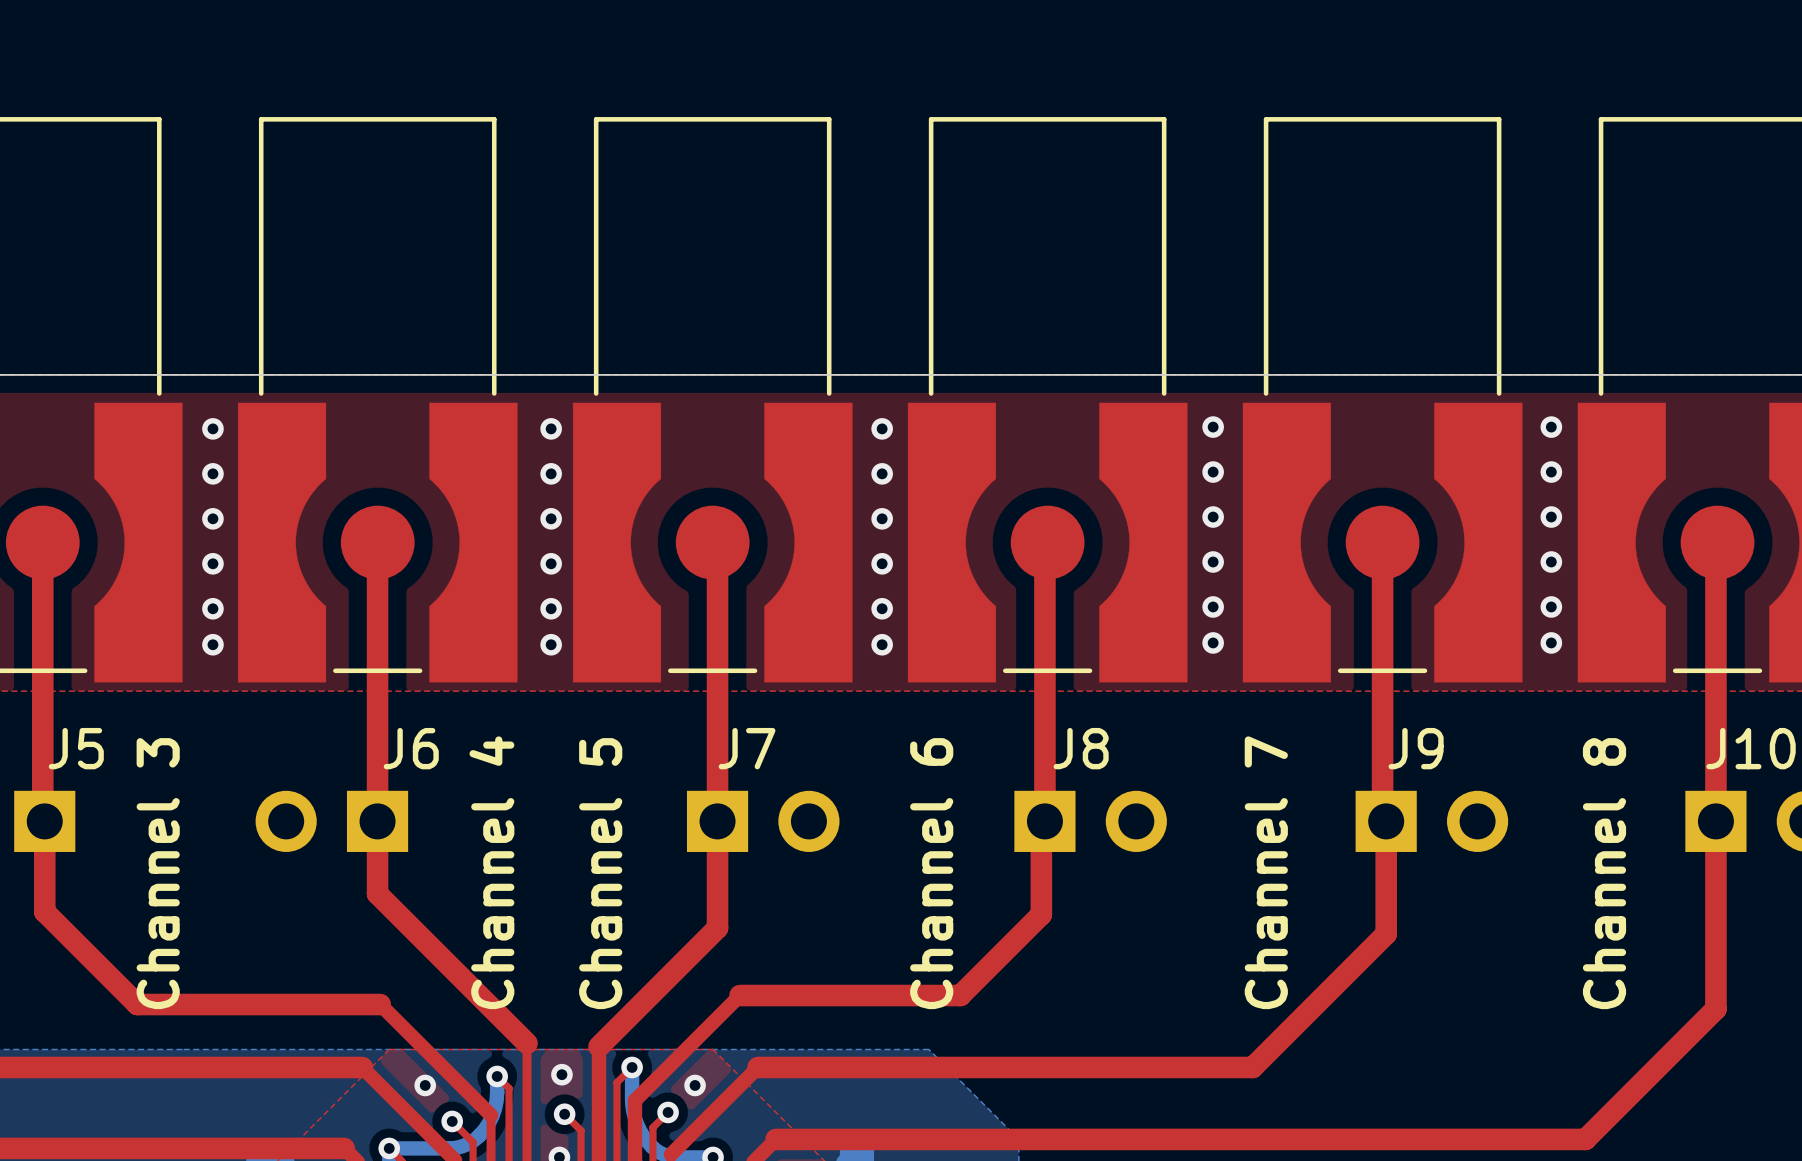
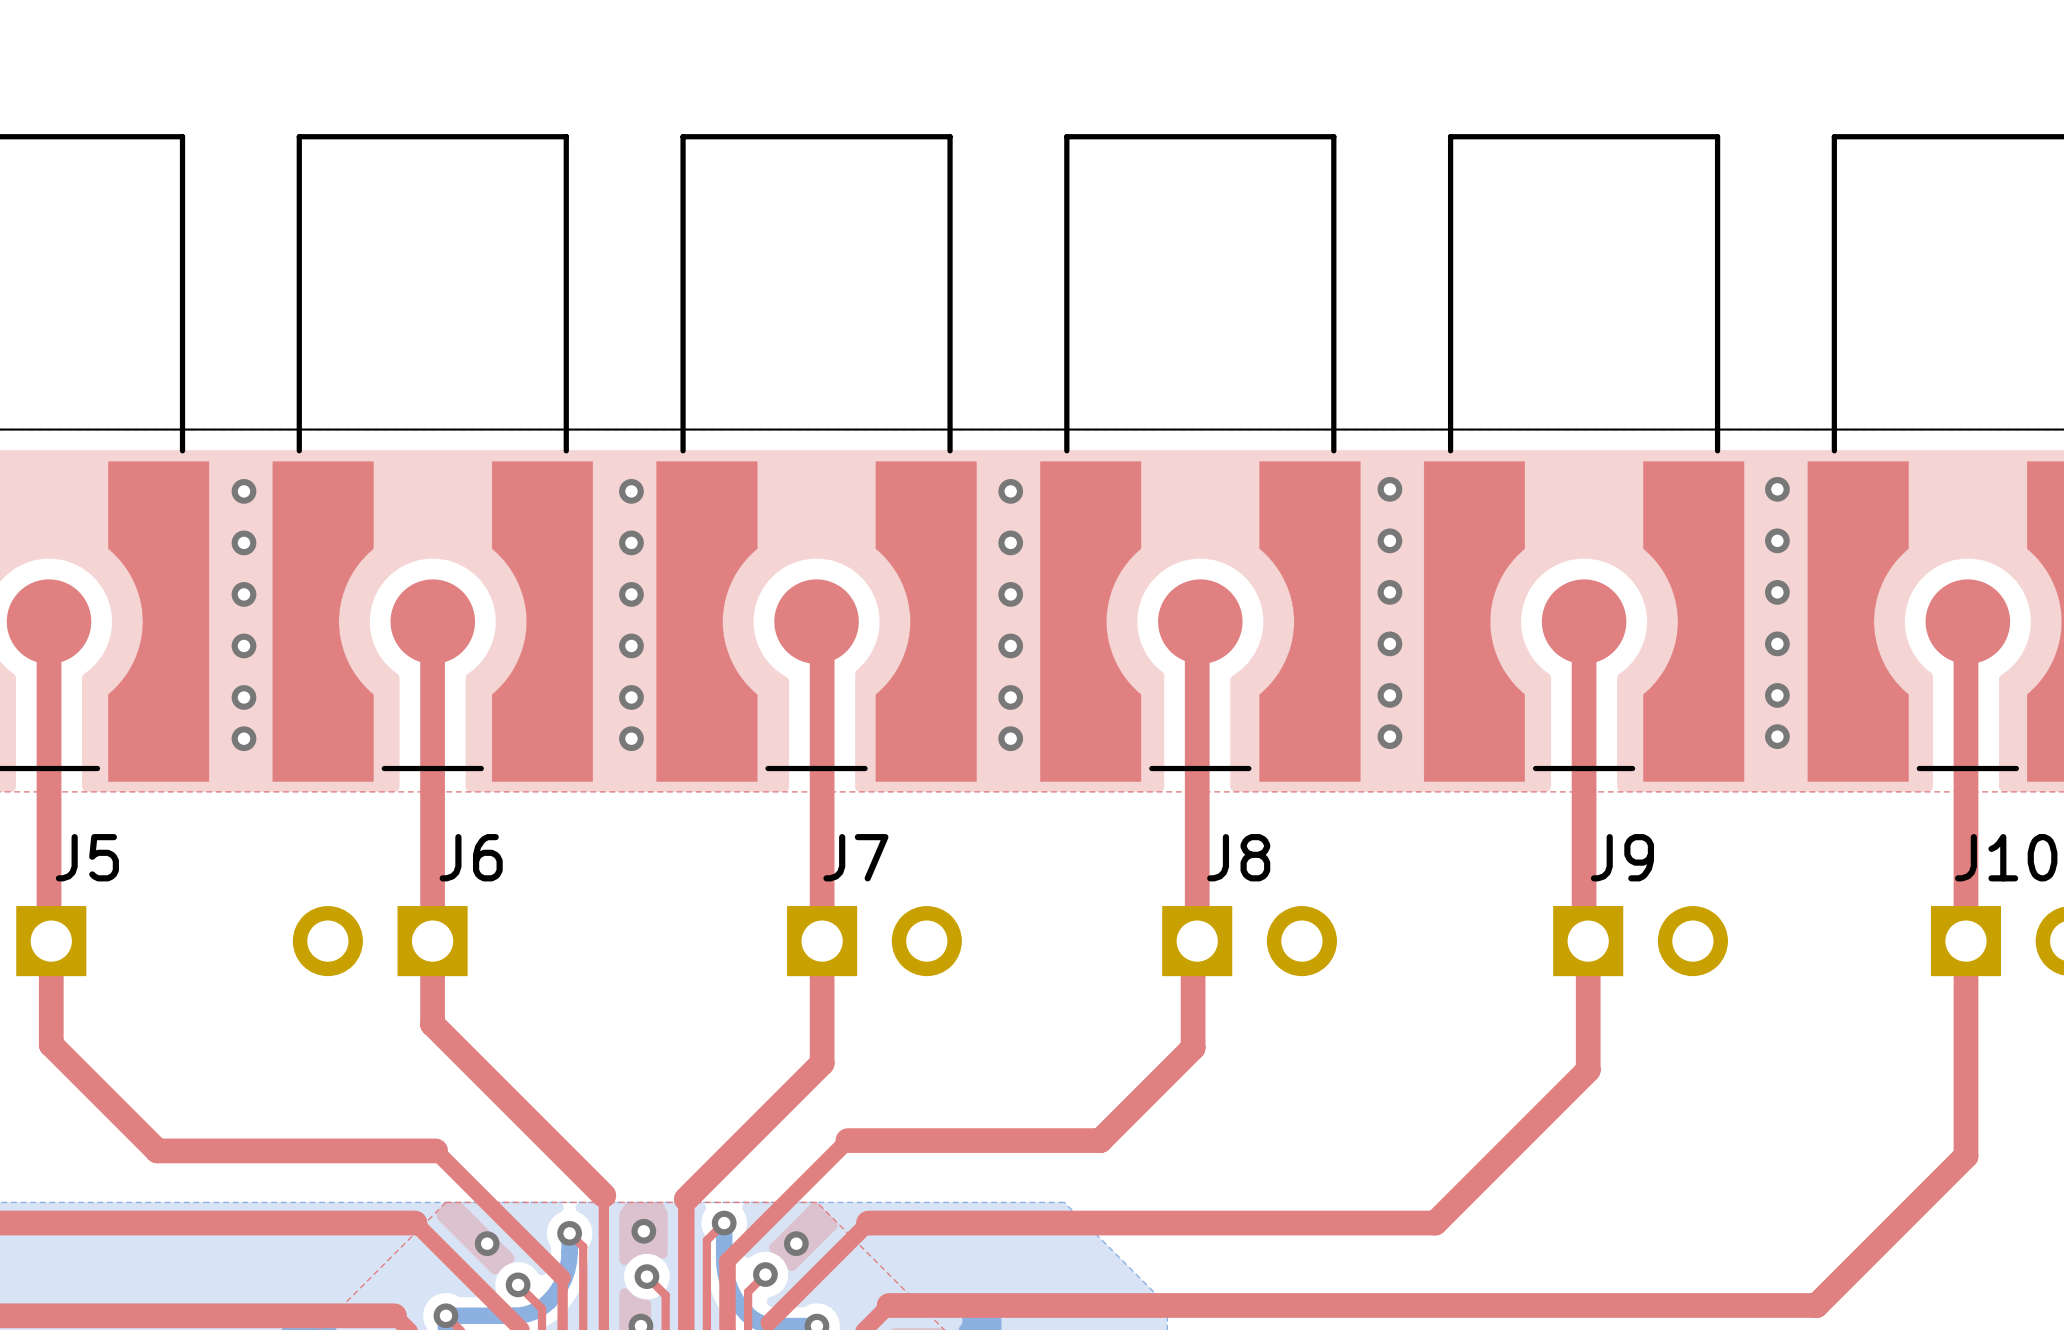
text: Channel 4 (491, 872) -> none
text: Channel 7 (1266, 872) -> none
text: Channel 3 (158, 873) -> none
text: Channel 5 (600, 873) -> none
text: Channel 6 (931, 873) -> none
text: Channel 8 (1604, 873) -> none

